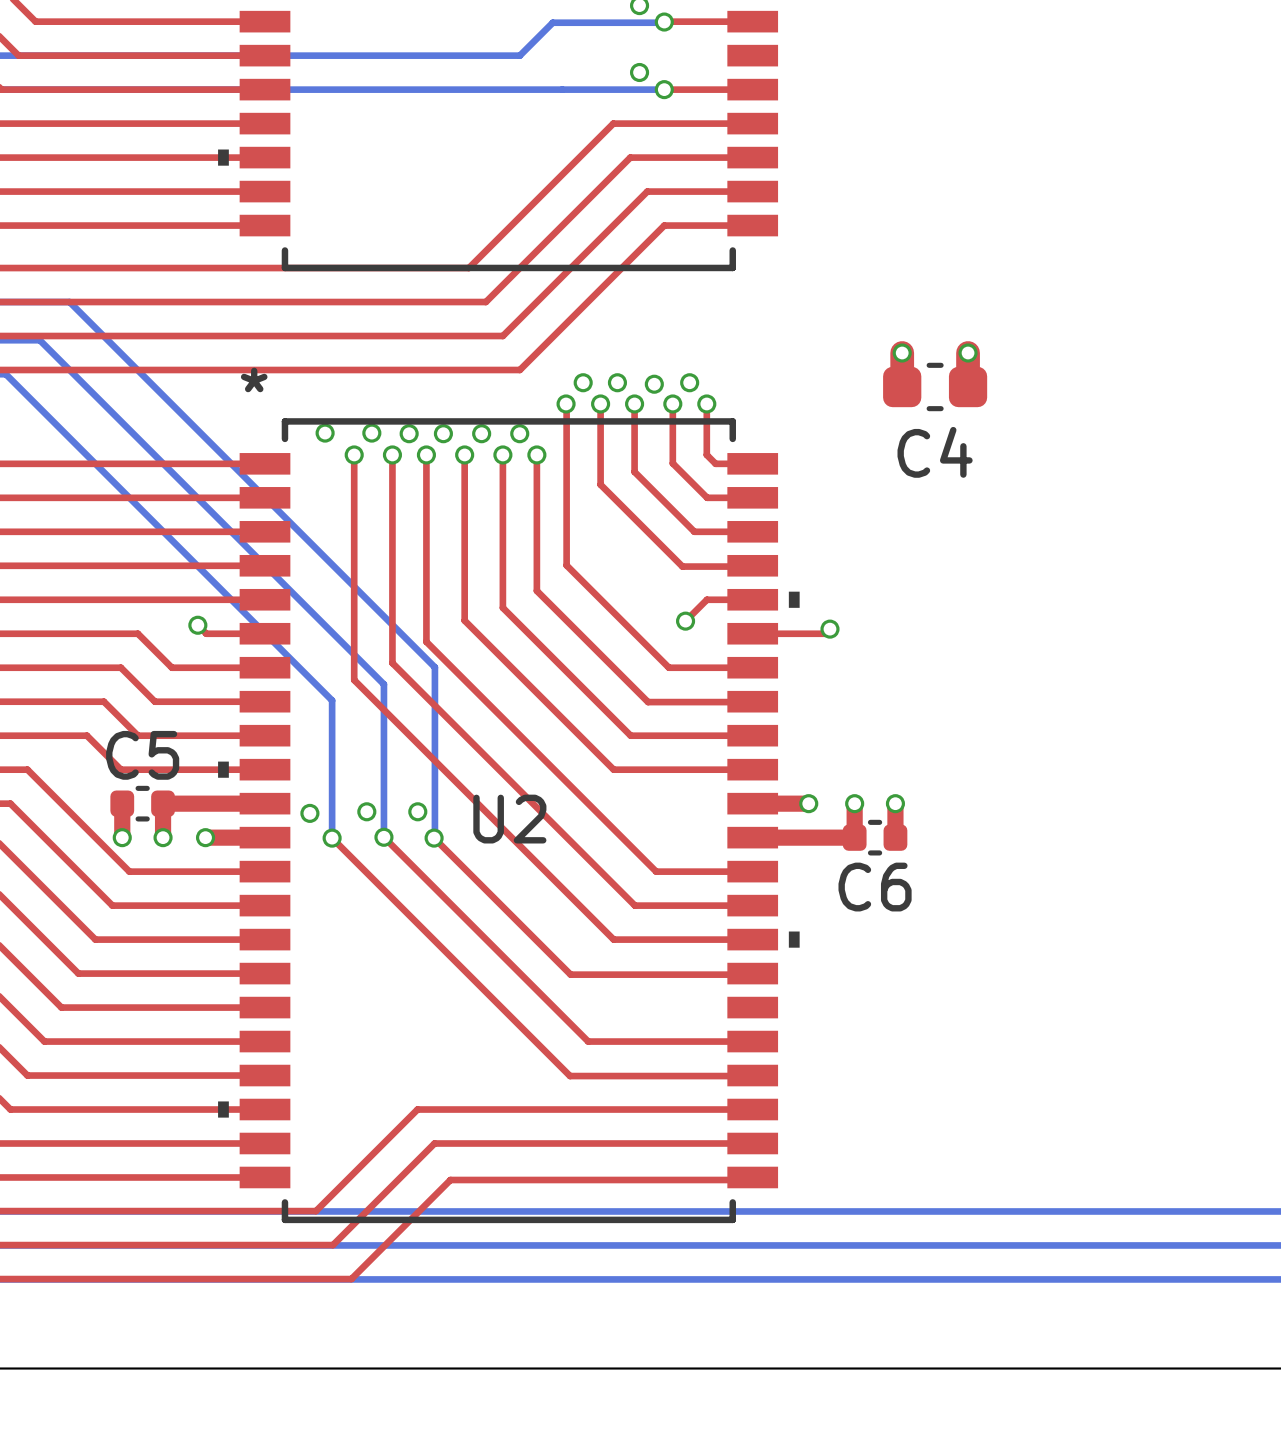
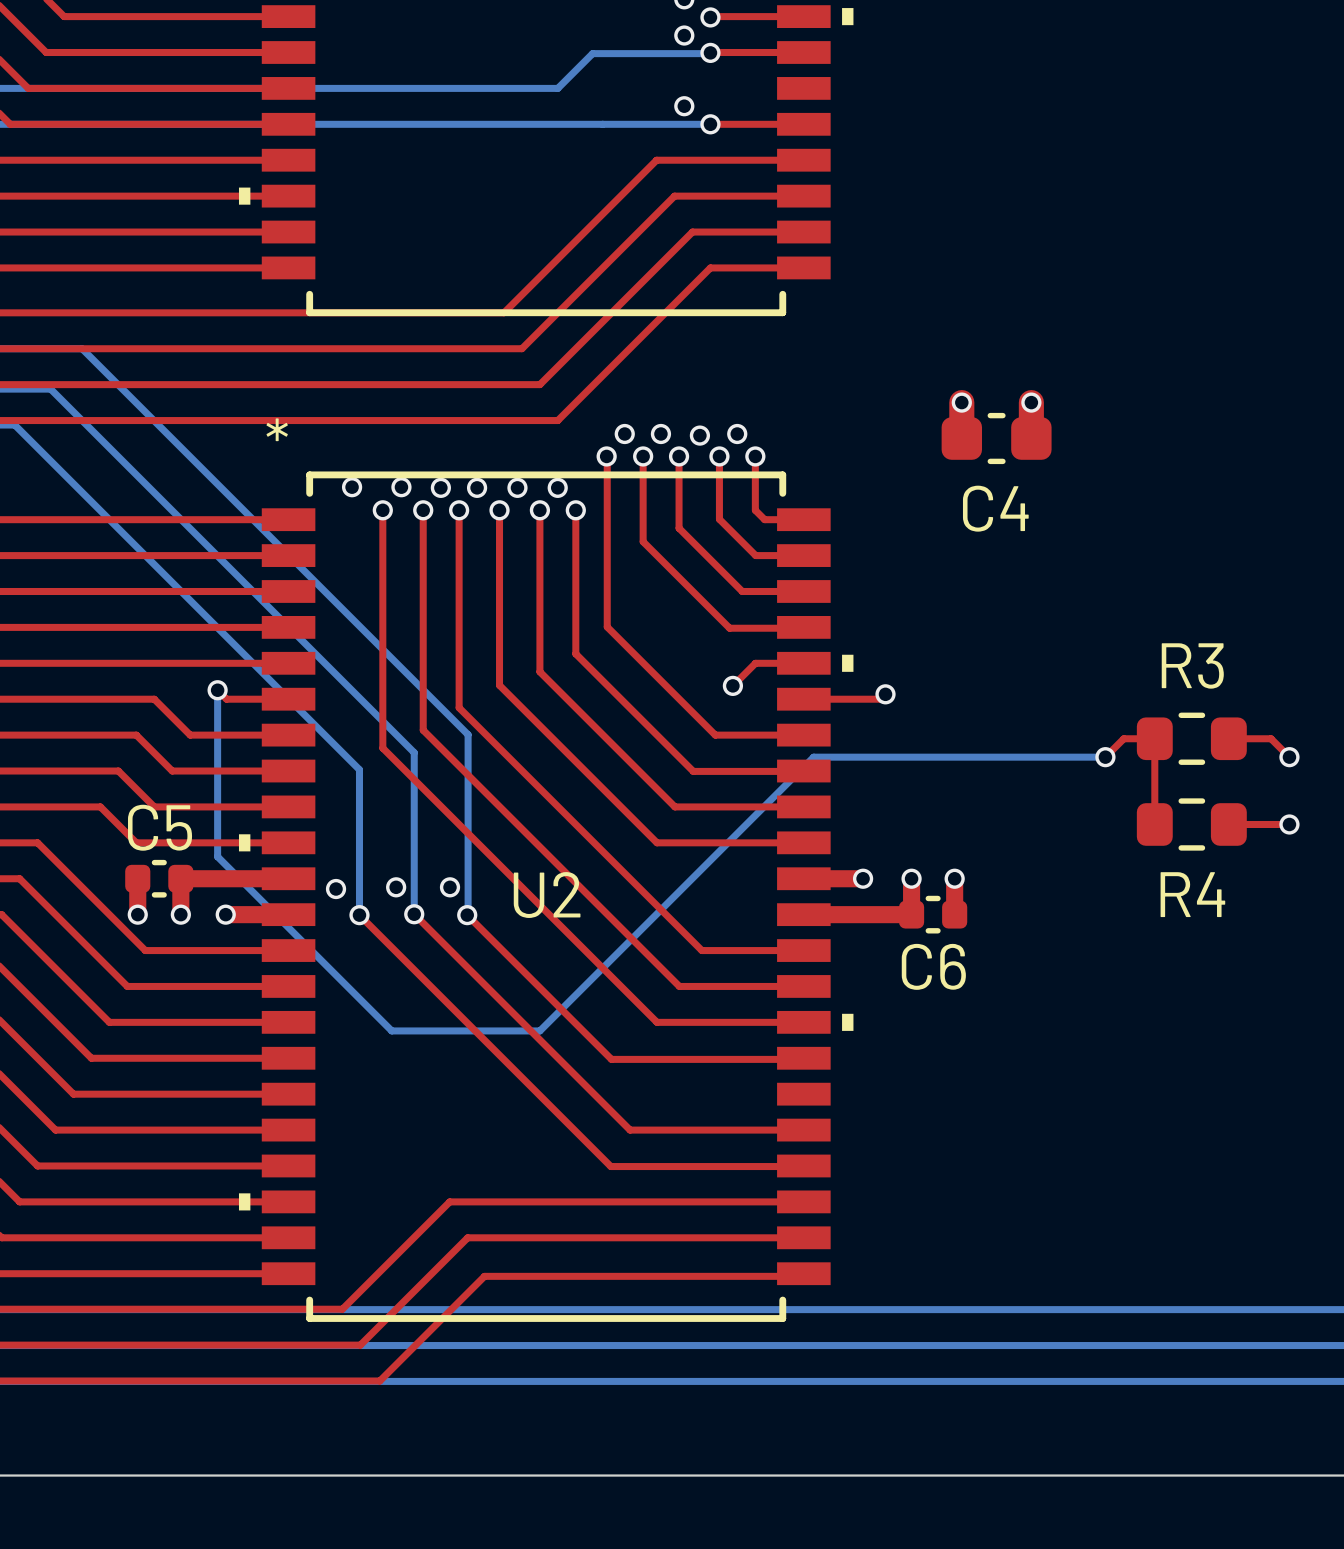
bottom track: none -> (217, 690) (217, 856) (391, 1030) (539, 1030) (813, 757) (1105, 757)
R3: none -> (1191, 738)
top track: none -> (1228, 738) (1271, 738) (1289, 757)
top track: none -> (1105, 757) (1123, 738) (1154, 738) (1154, 824)
via: none -> (1105, 757)
via: none -> (1289, 757)
R4: none -> (1191, 824)
top track: none -> (1228, 824) (1289, 824)
via: none -> (1289, 824)

